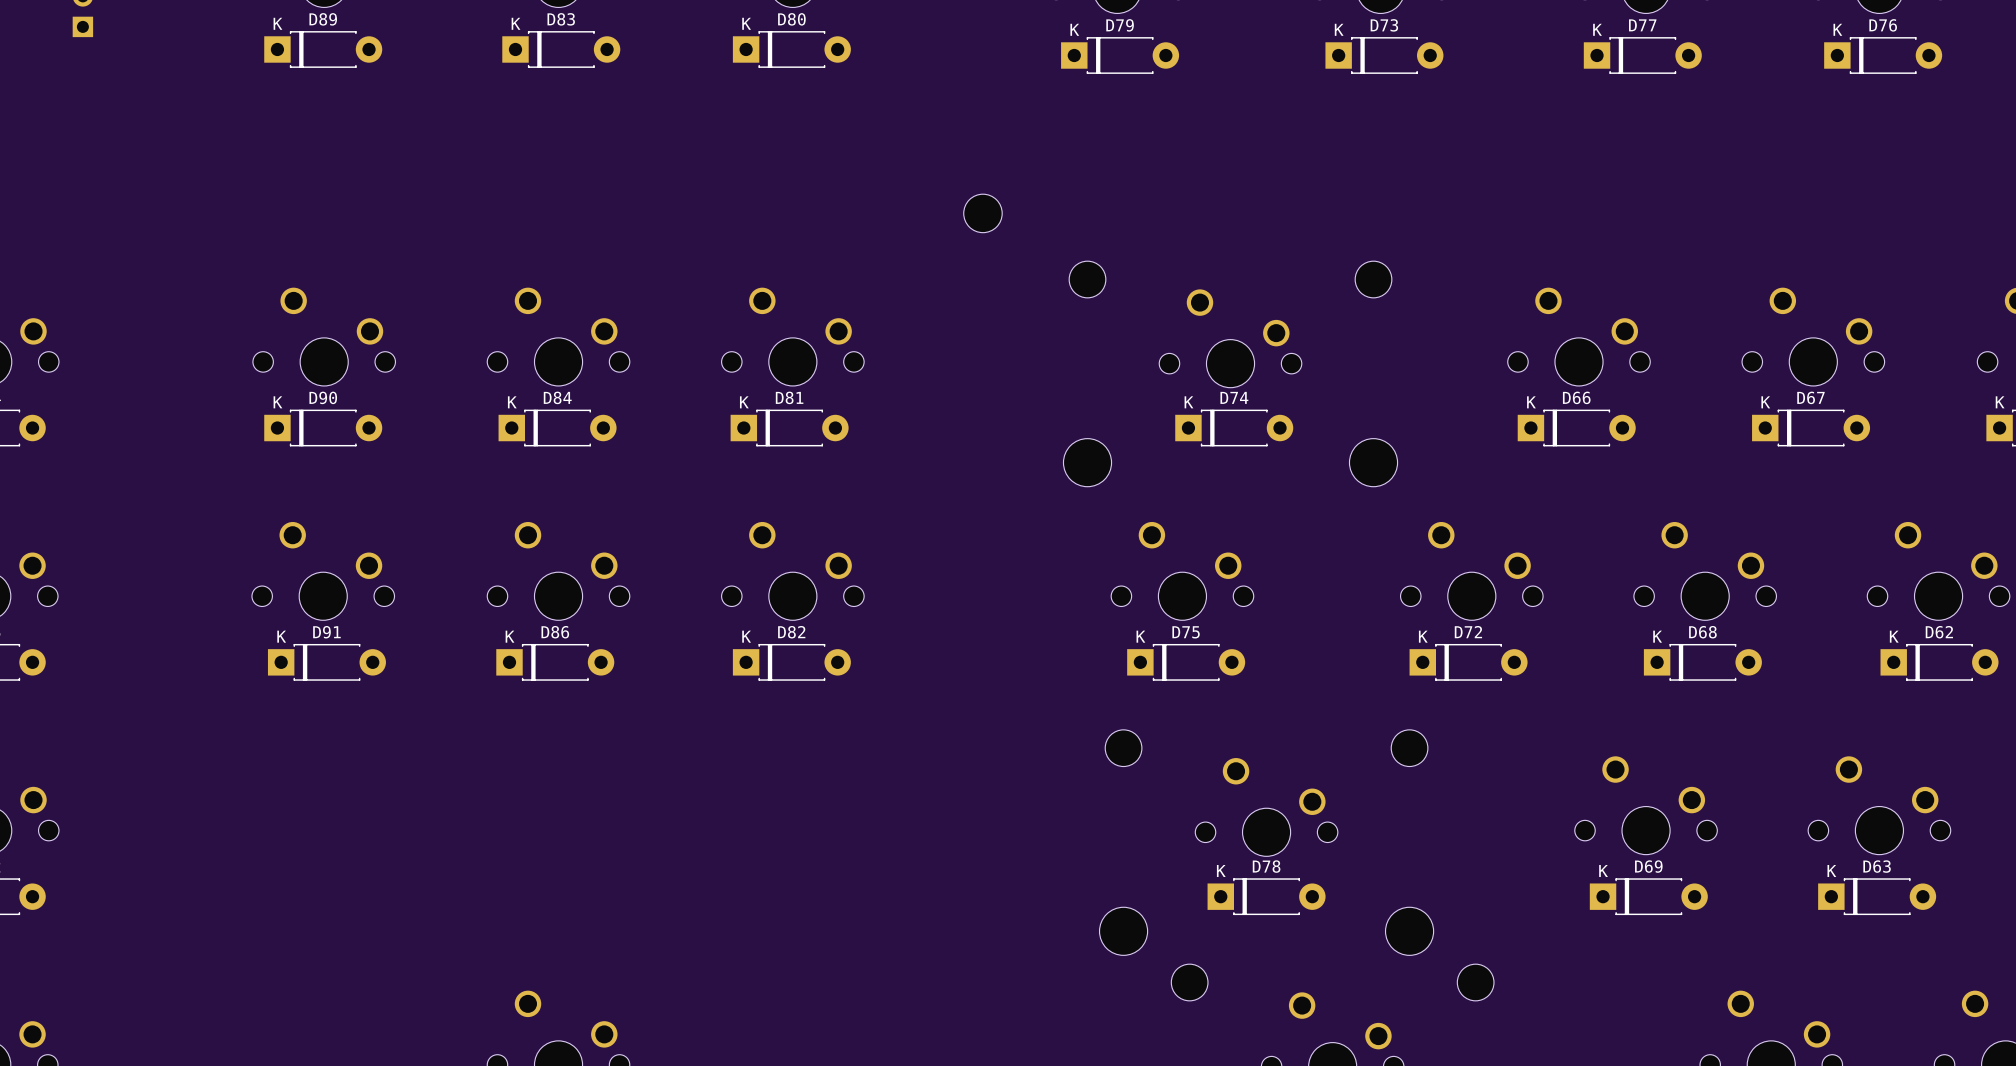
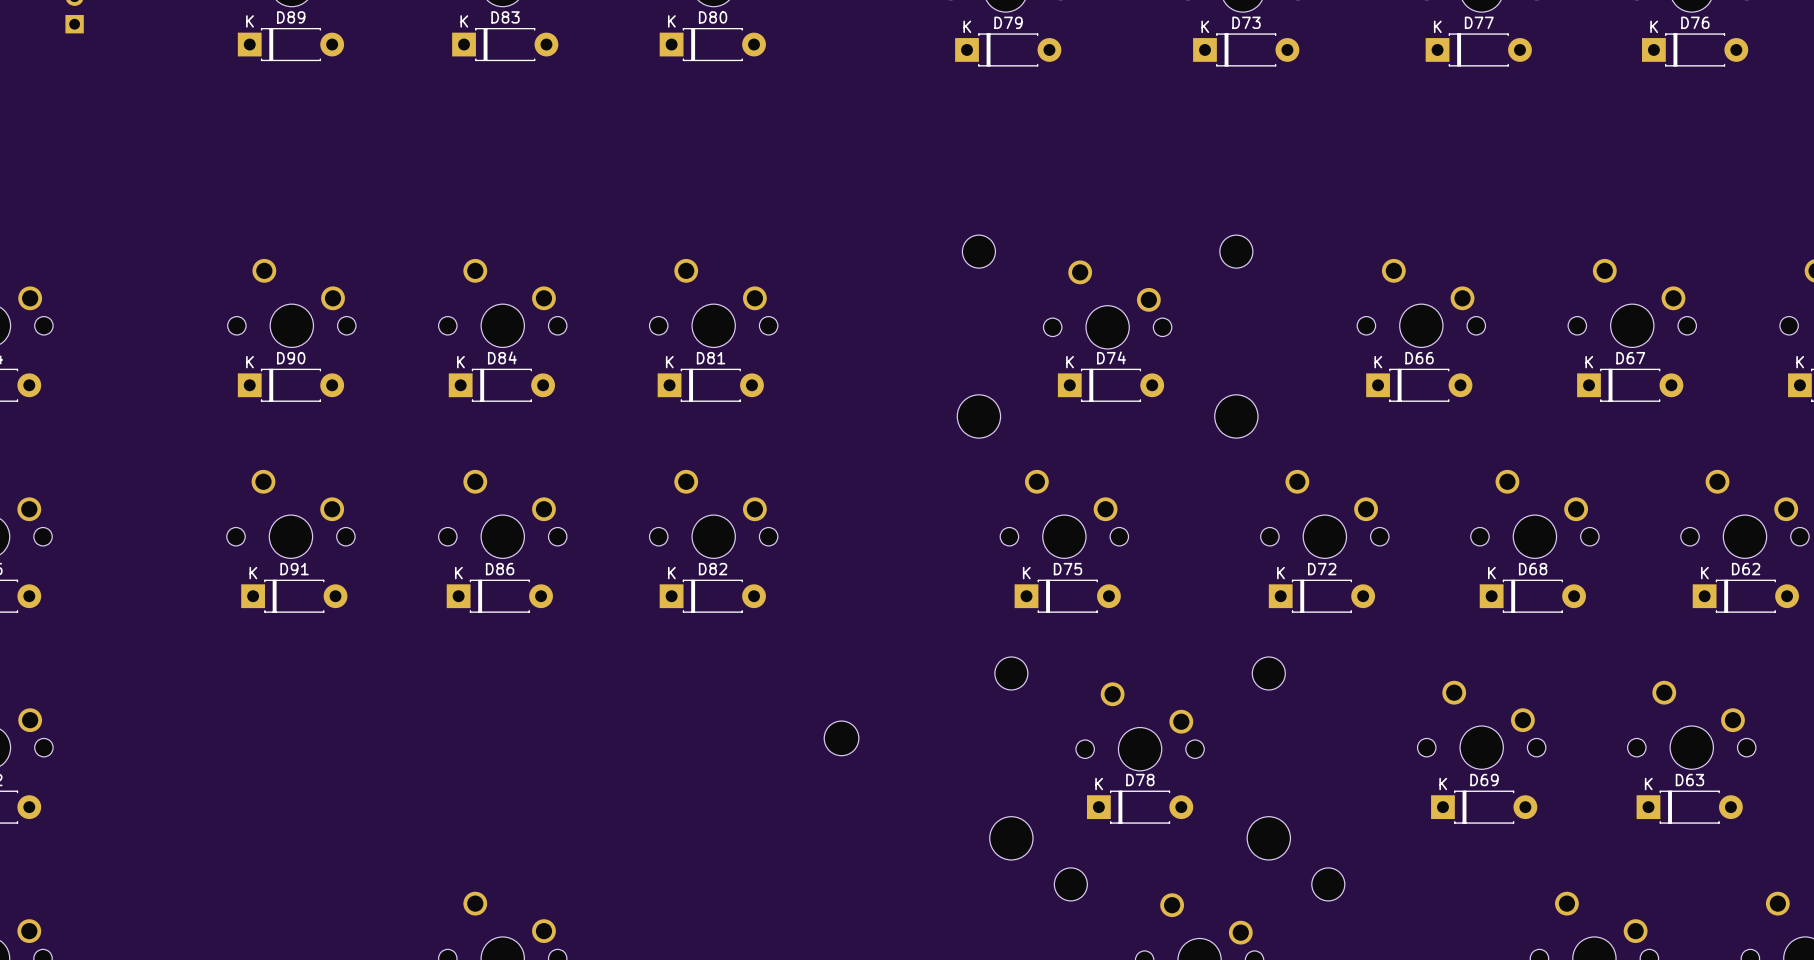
part: (982, 213) -> none
part: none -> (841, 738)

